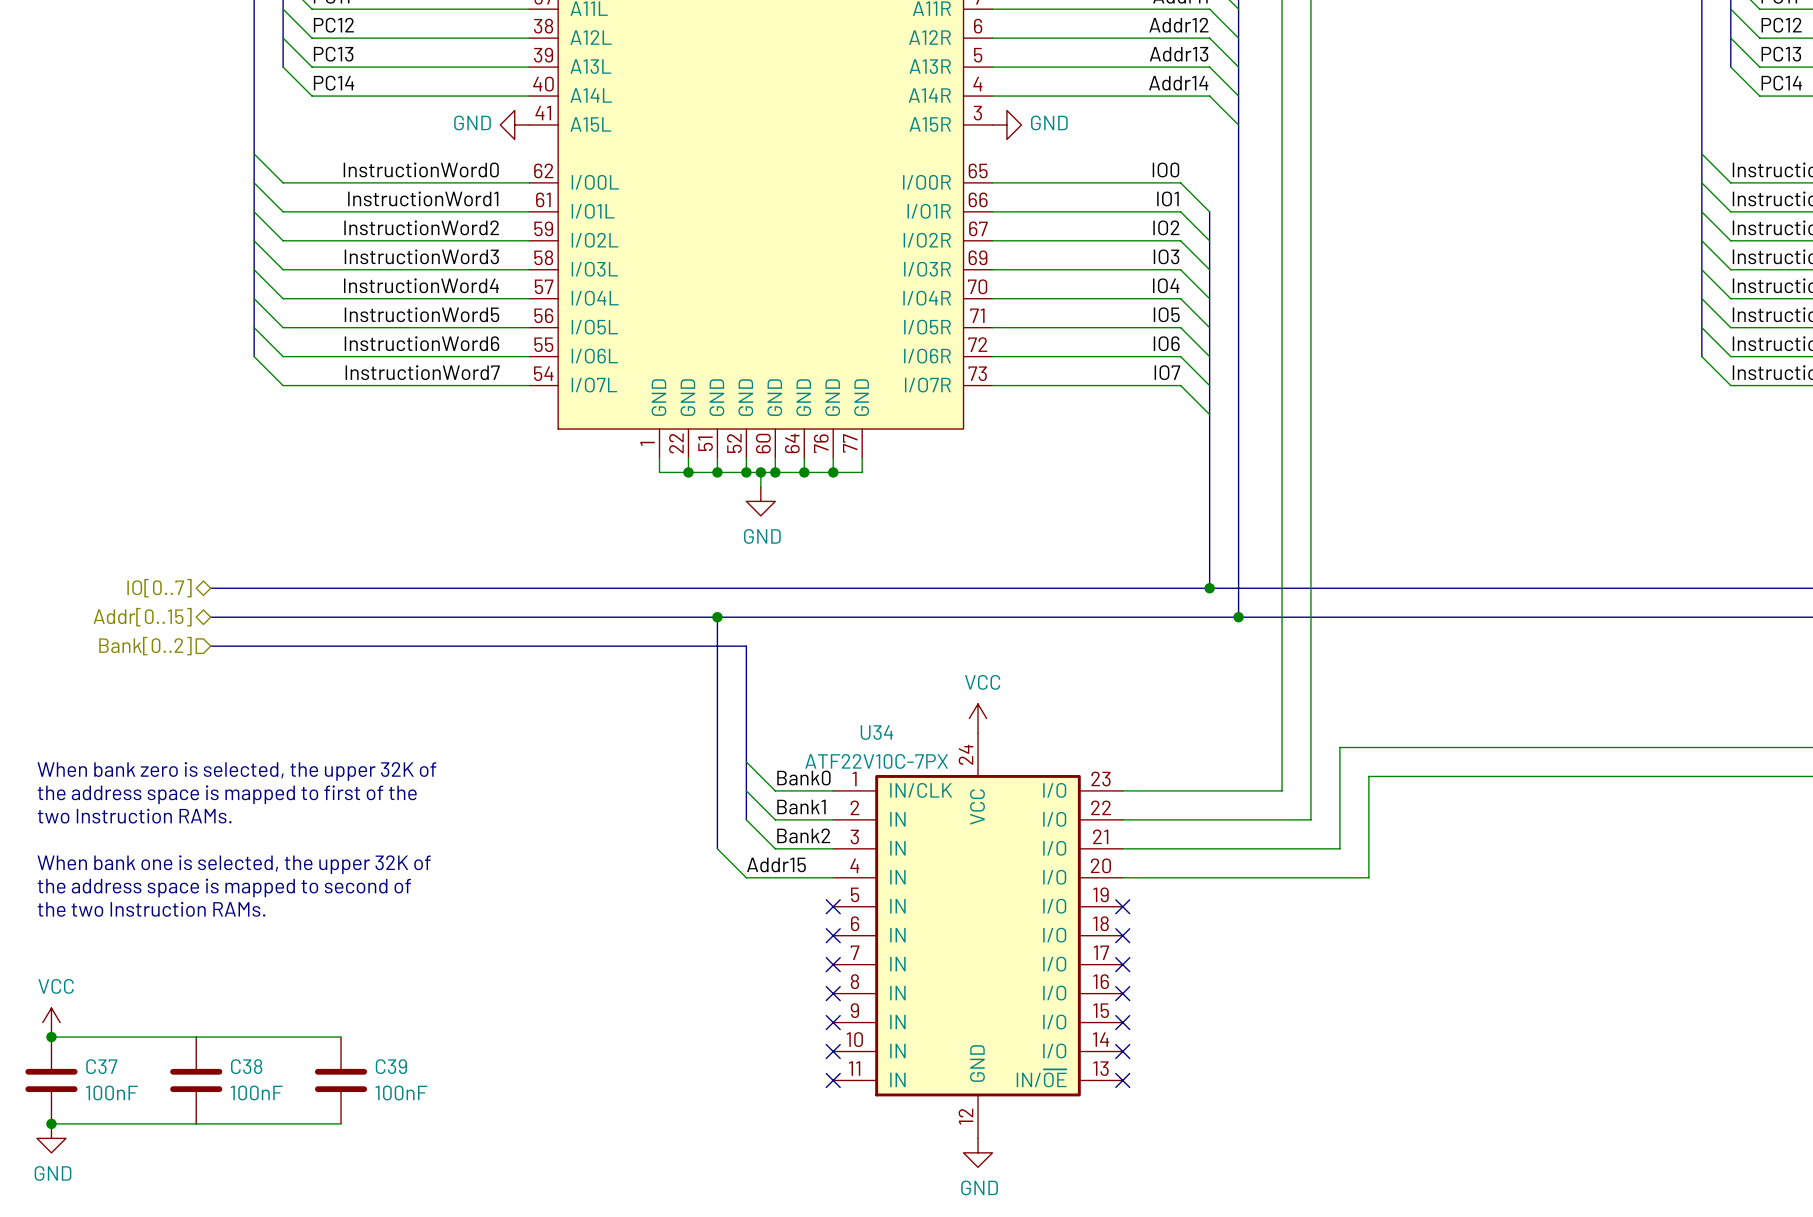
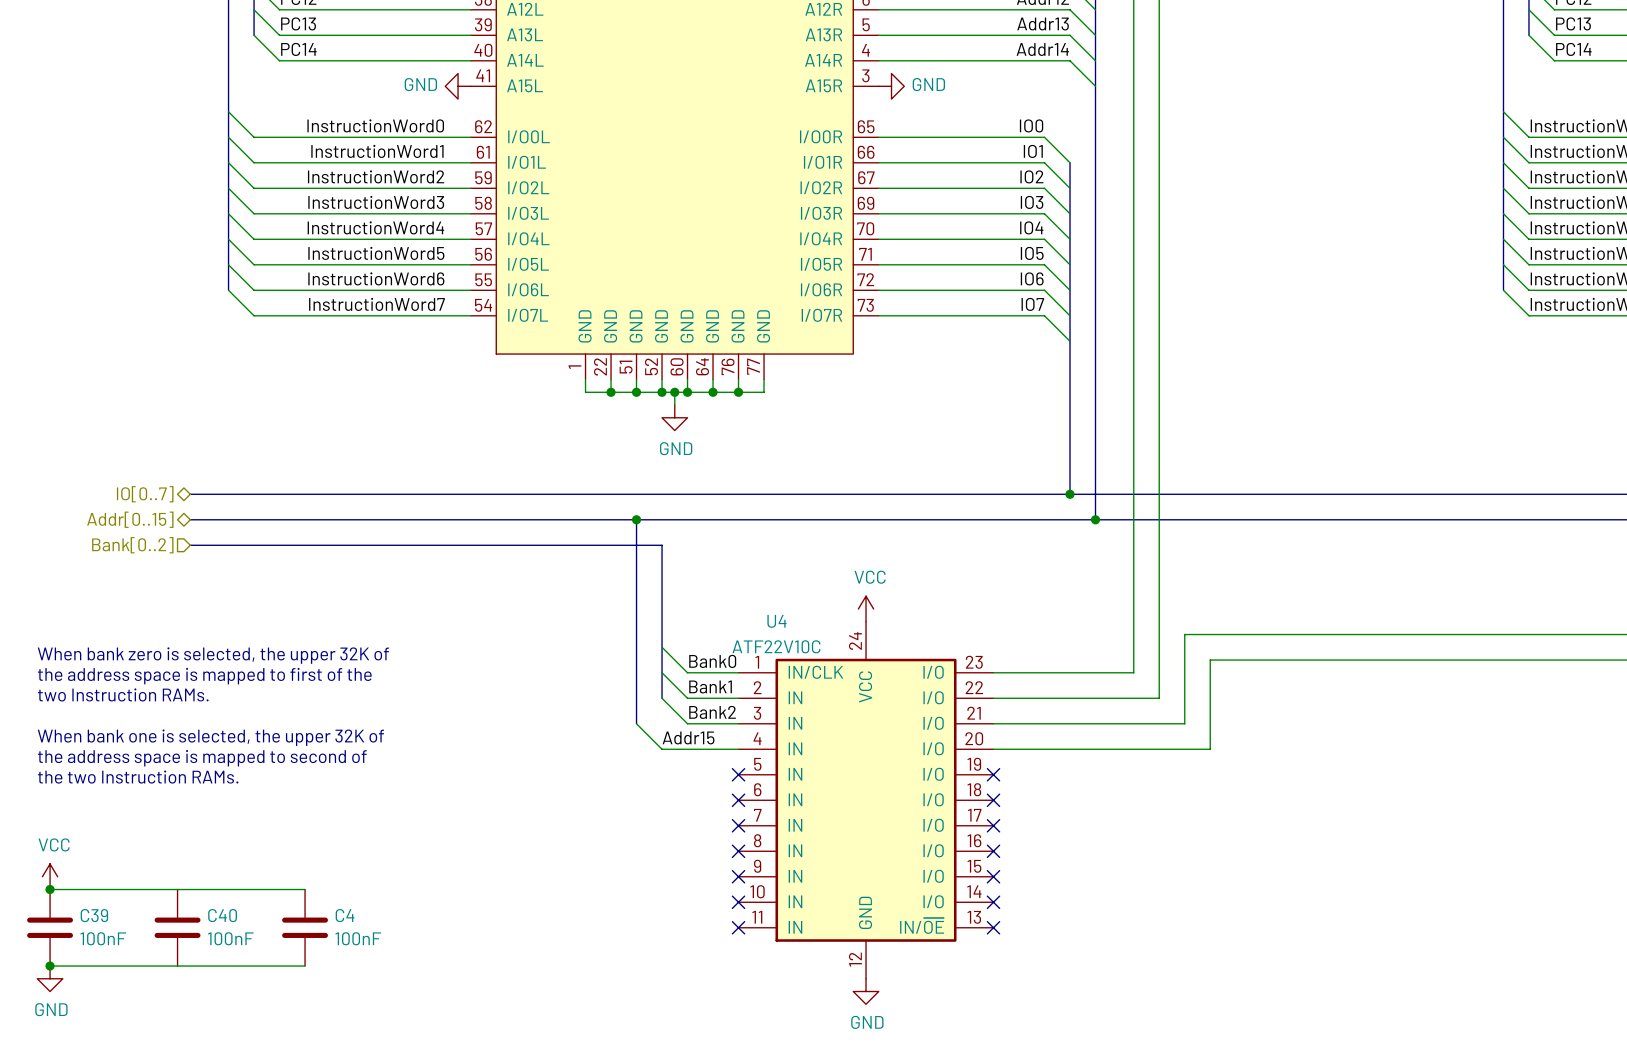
U34 name: U34 (876, 732) -> U4 (776, 621)
U34 value: ATF22V10C-7PX (876, 761) -> ATF22V10C (776, 646)
C37 name: C37 (101, 1066) -> C39 (94, 915)
C38 name: C38 (246, 1066) -> C40 (222, 915)
C39 name: C39 (391, 1066) -> C4 (345, 915)

